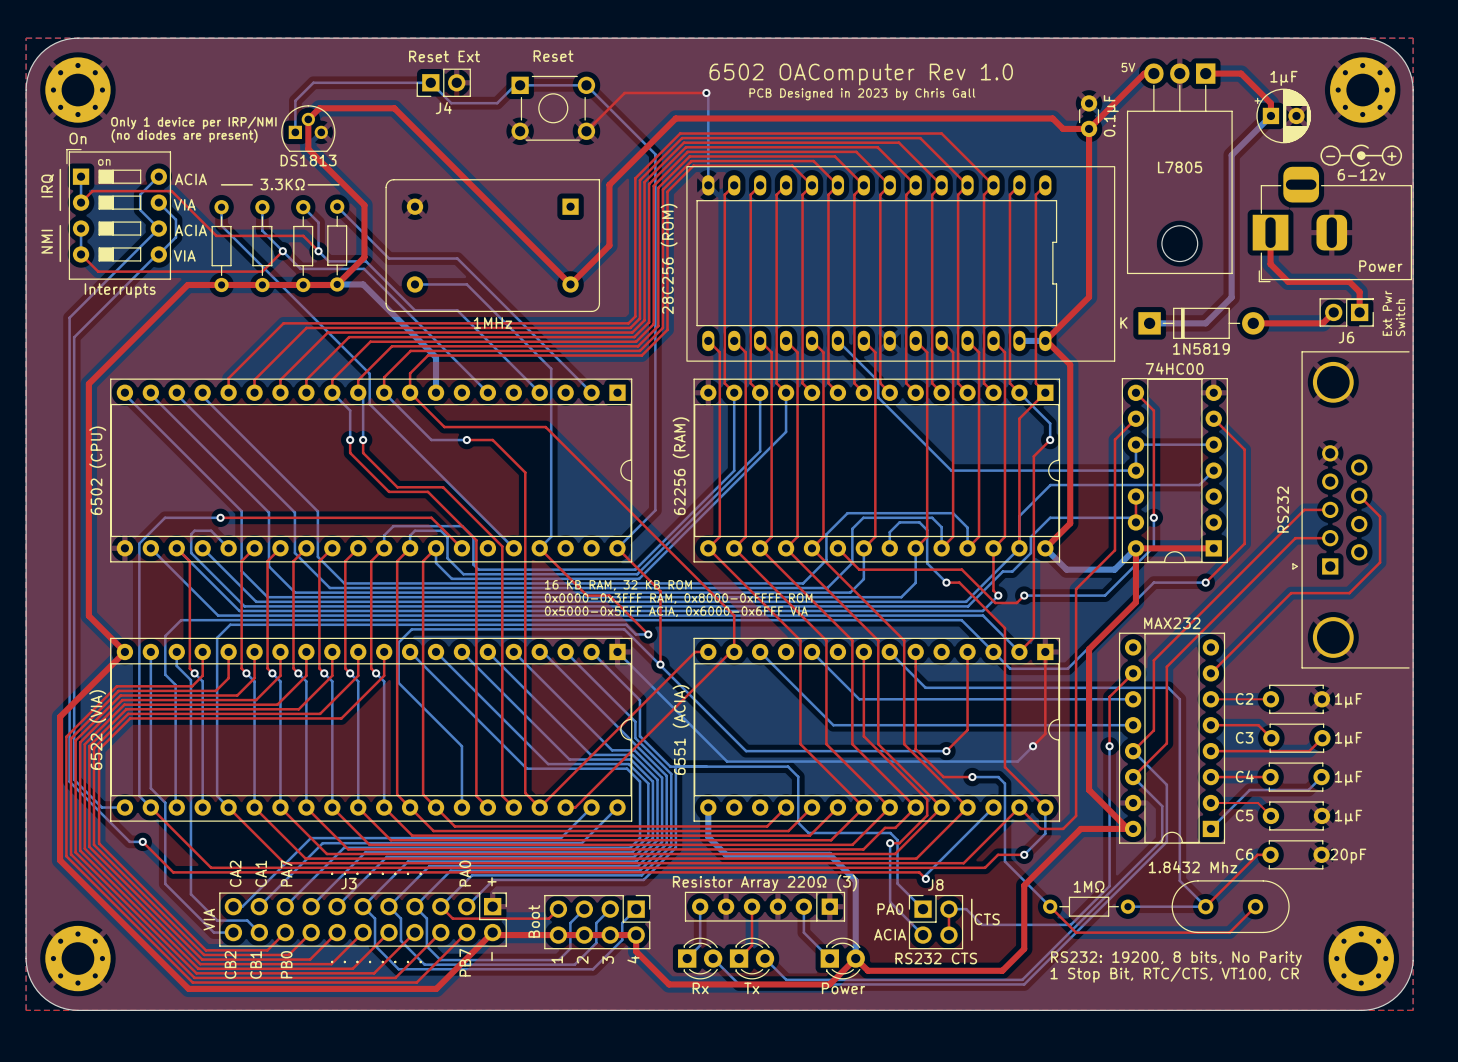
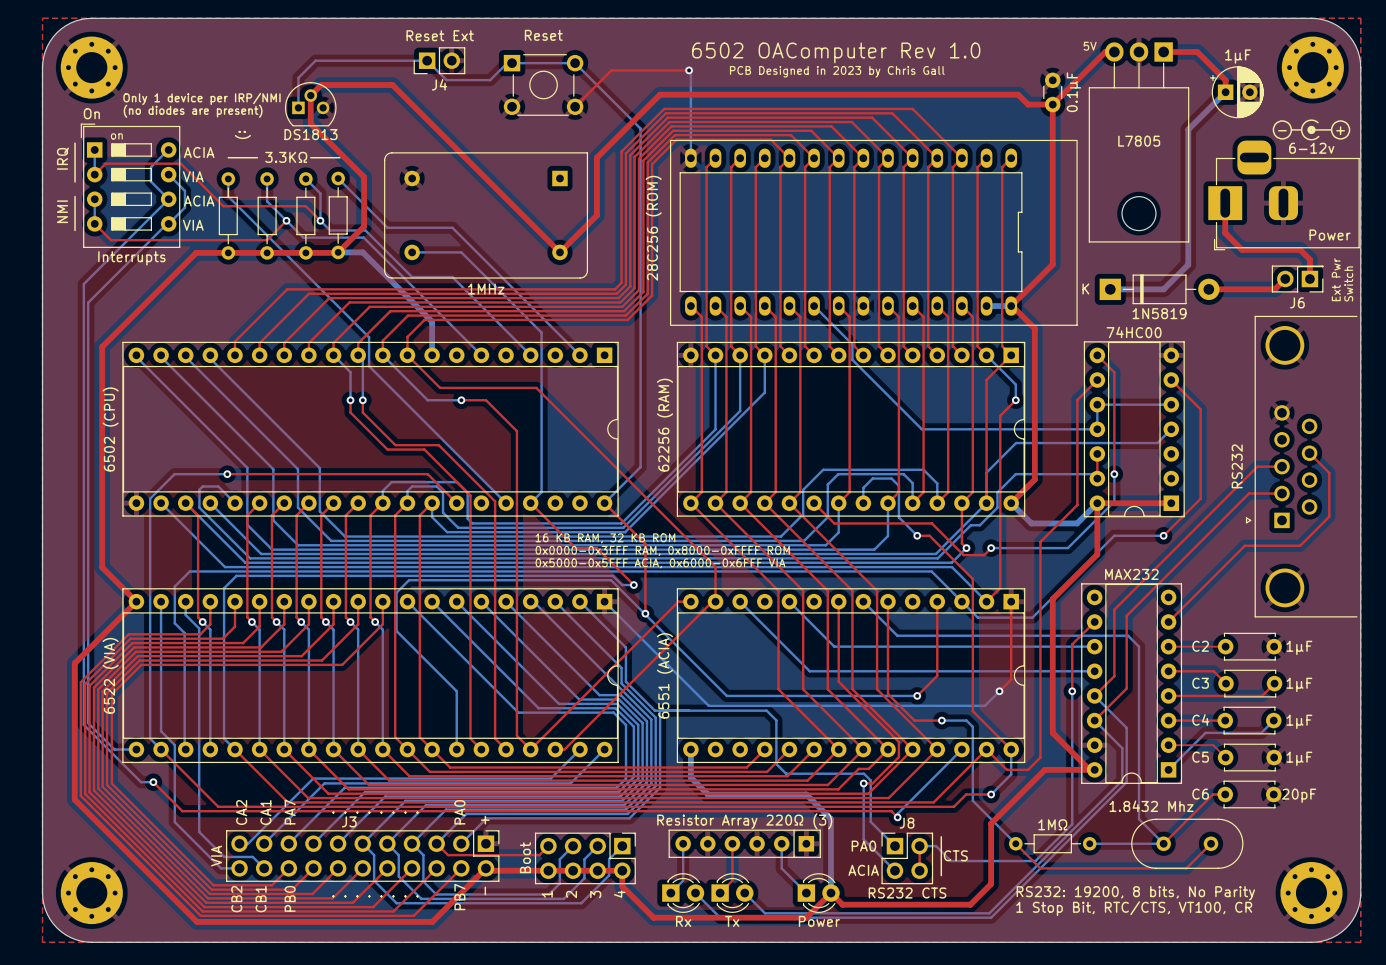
text: none -> :) (242, 134)

